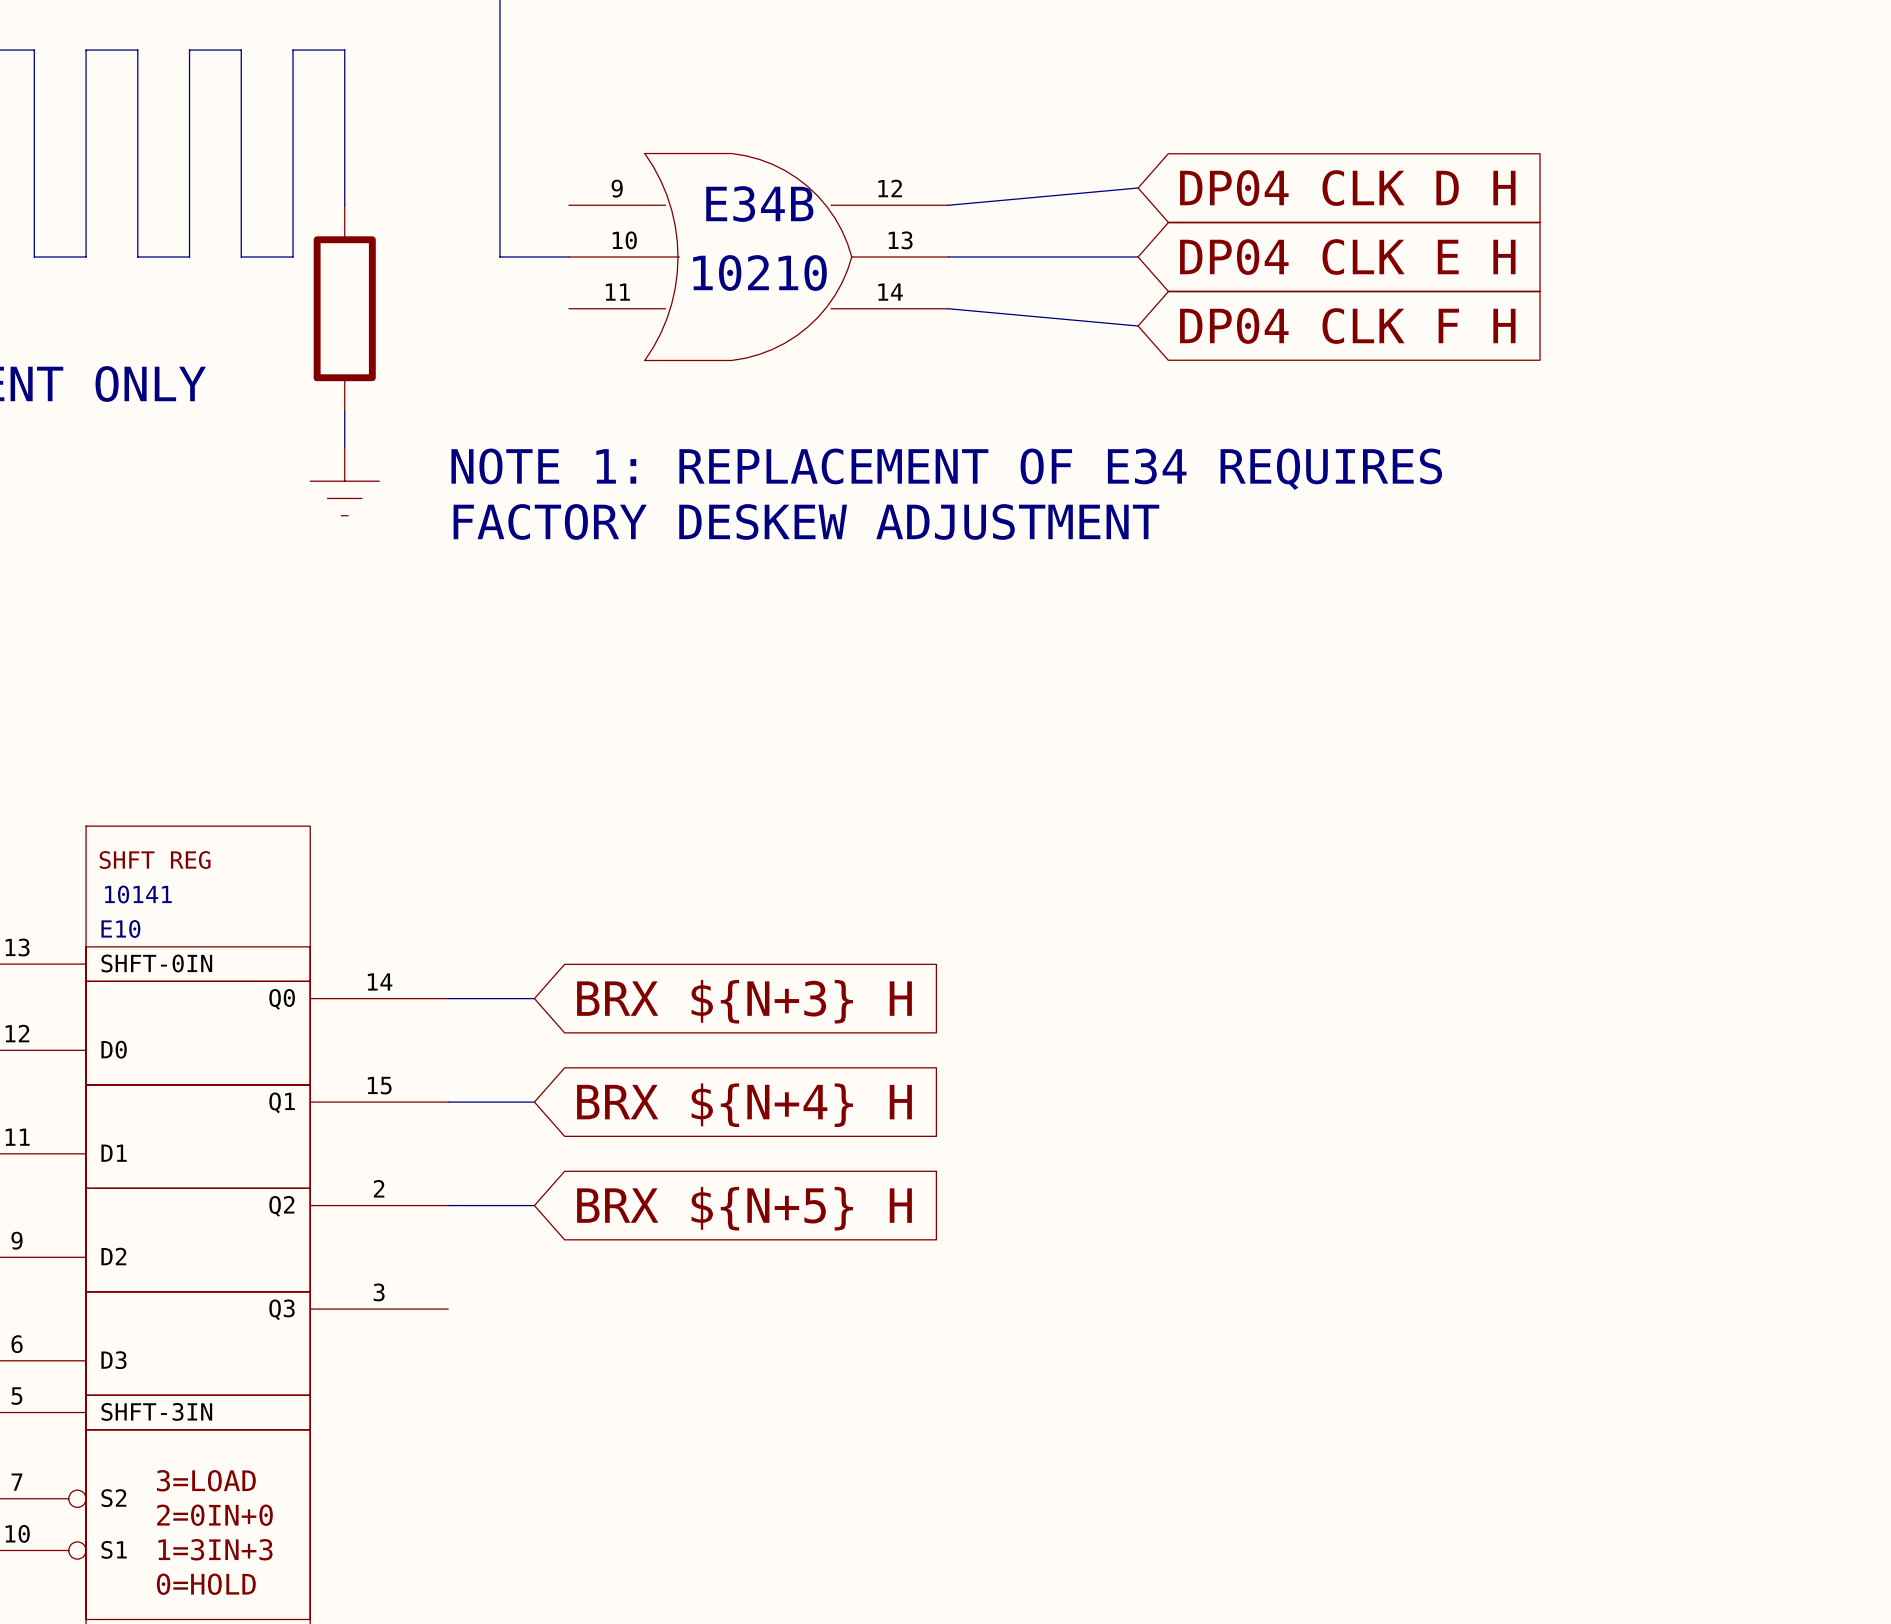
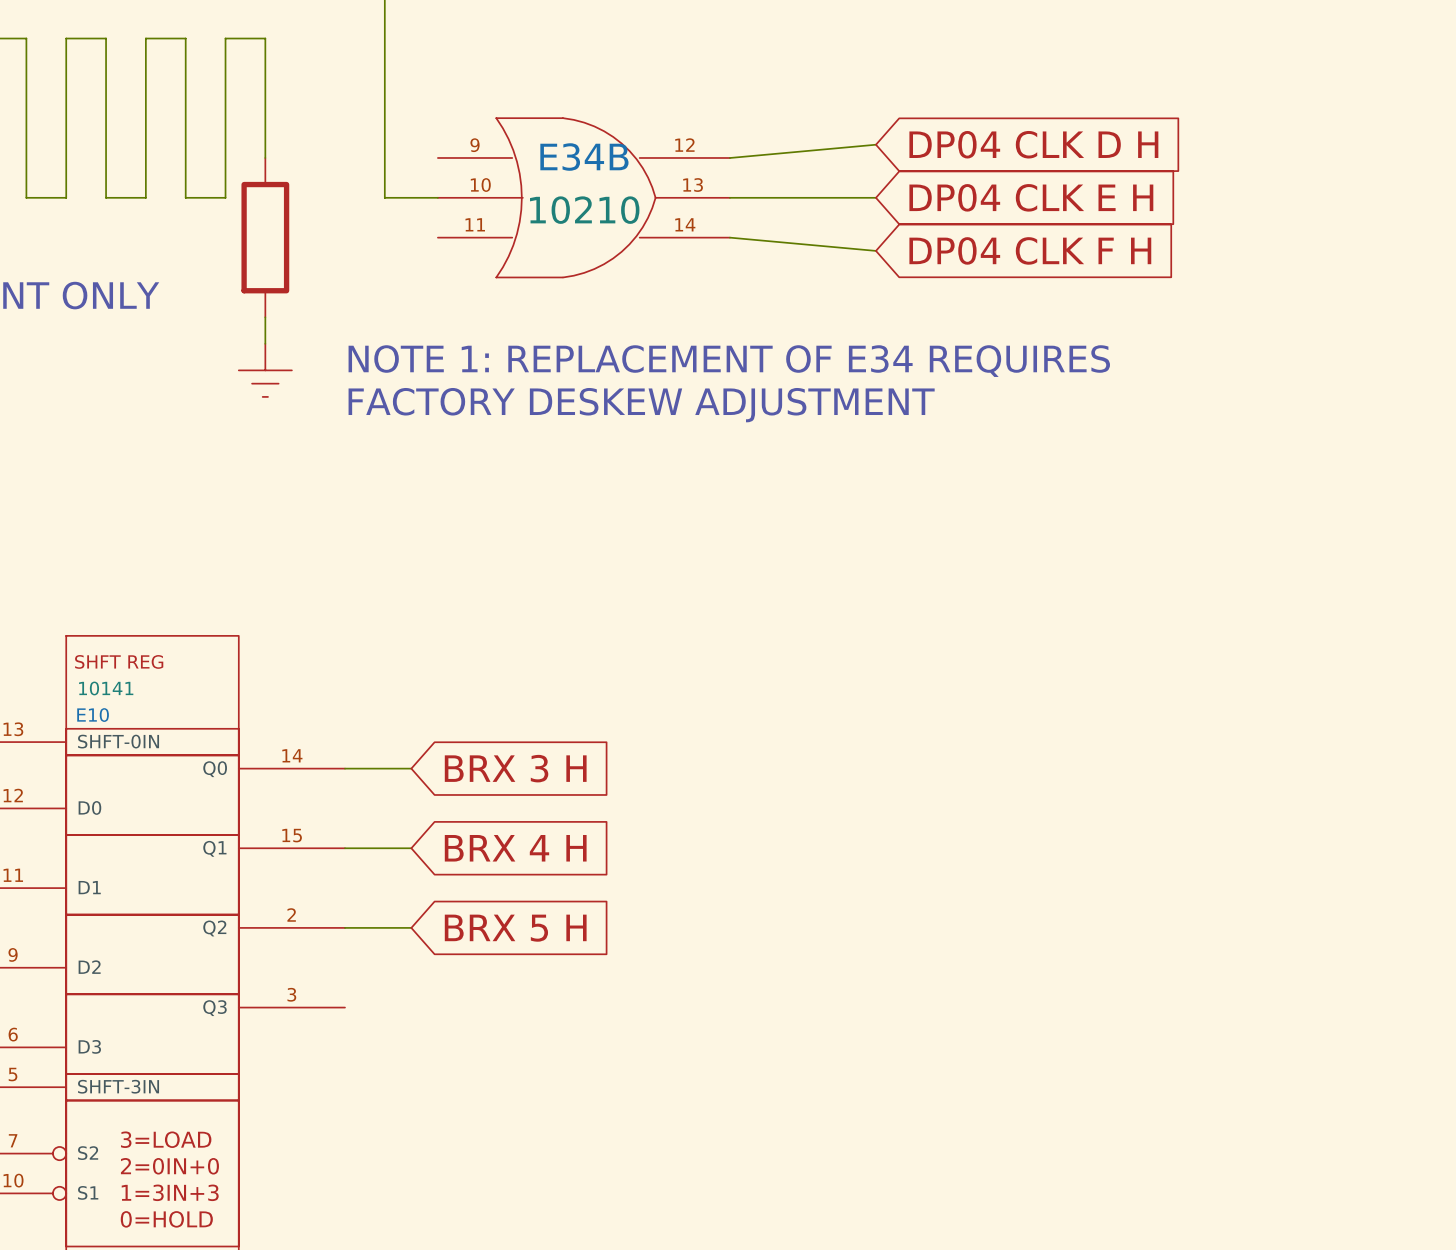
global label: BRX ${N+3} H (744, 1001) -> BRX 3 H (515, 768)
global label: BRX ${N+4} H (744, 1105) -> BRX 4 H (515, 848)
global label: BRX ${N+5} H (744, 1208) -> BRX 5 H (515, 928)

